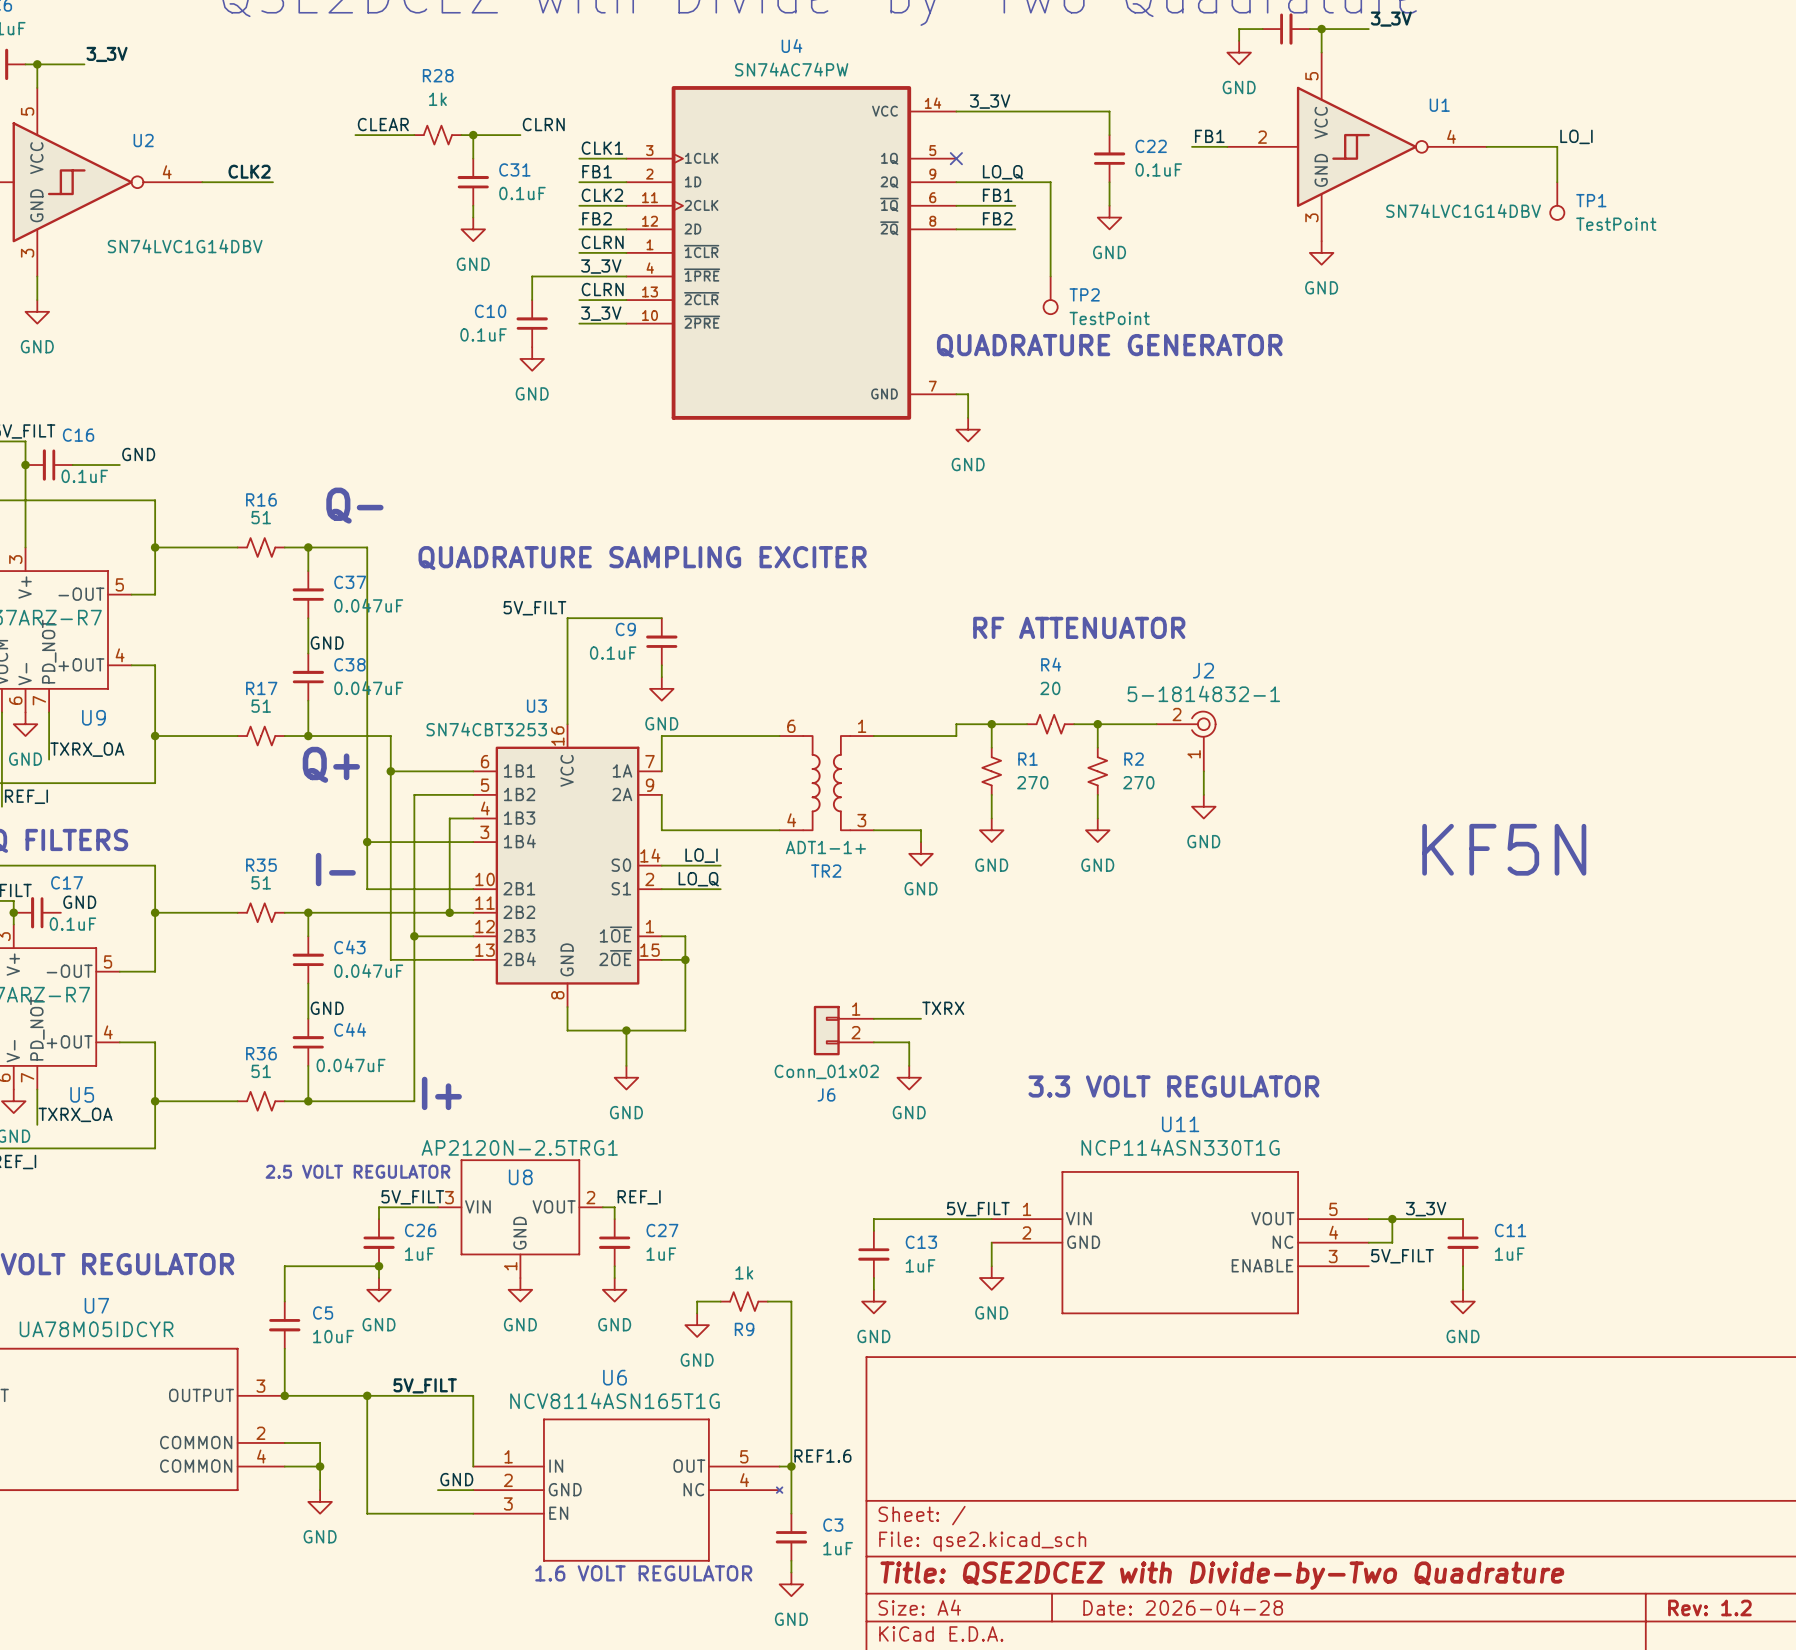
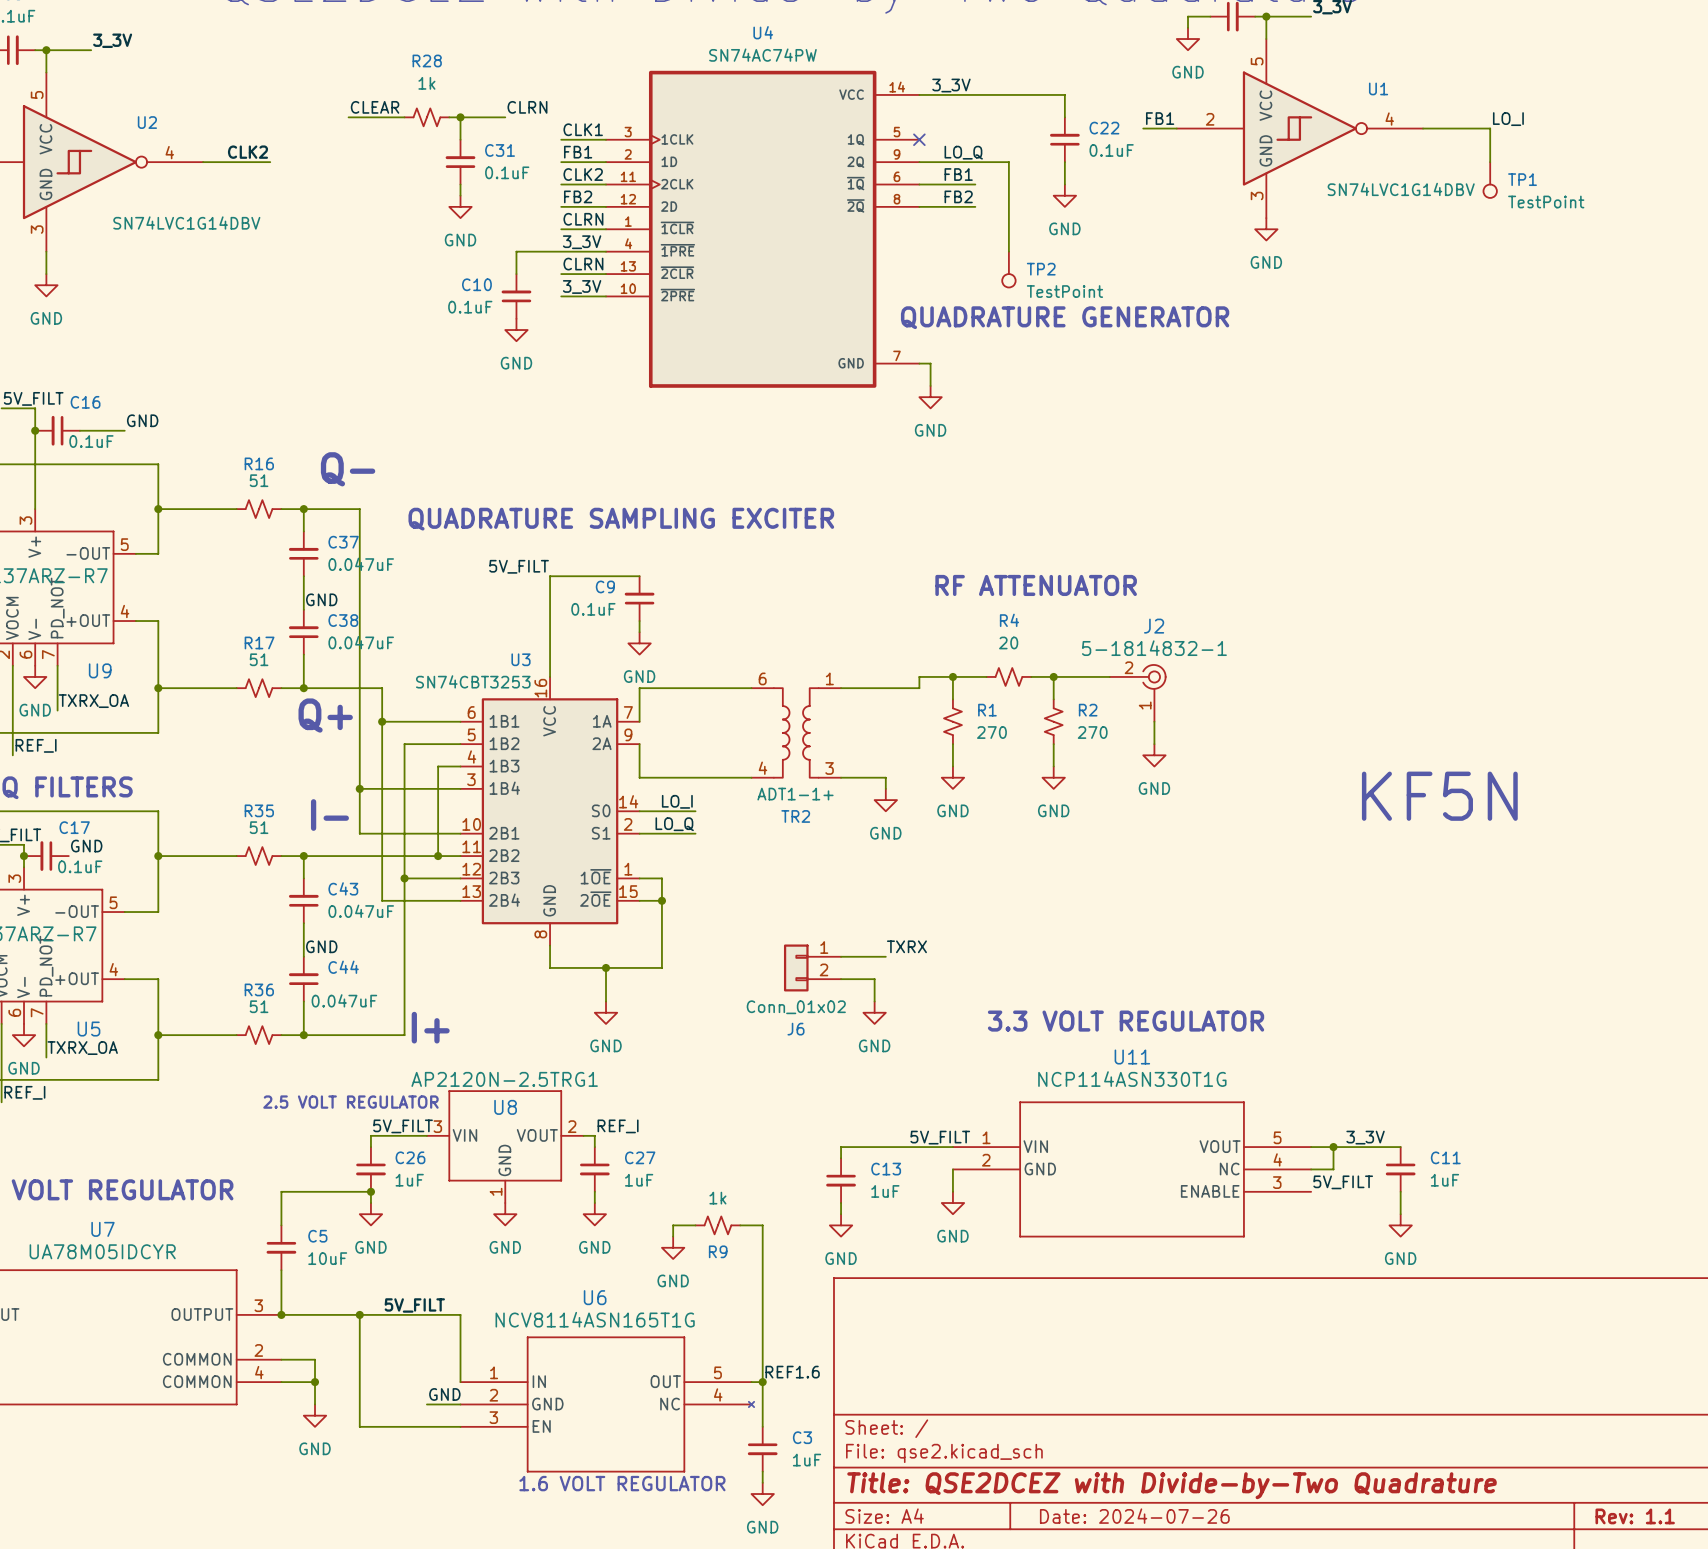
title block: Date: 2026-04-28 (1183, 1607) -> Date: 2024-07-26 (1134, 1516)
title block: Rev: 1.2 (1709, 1607) -> Rev: 1.1 (1635, 1516)

